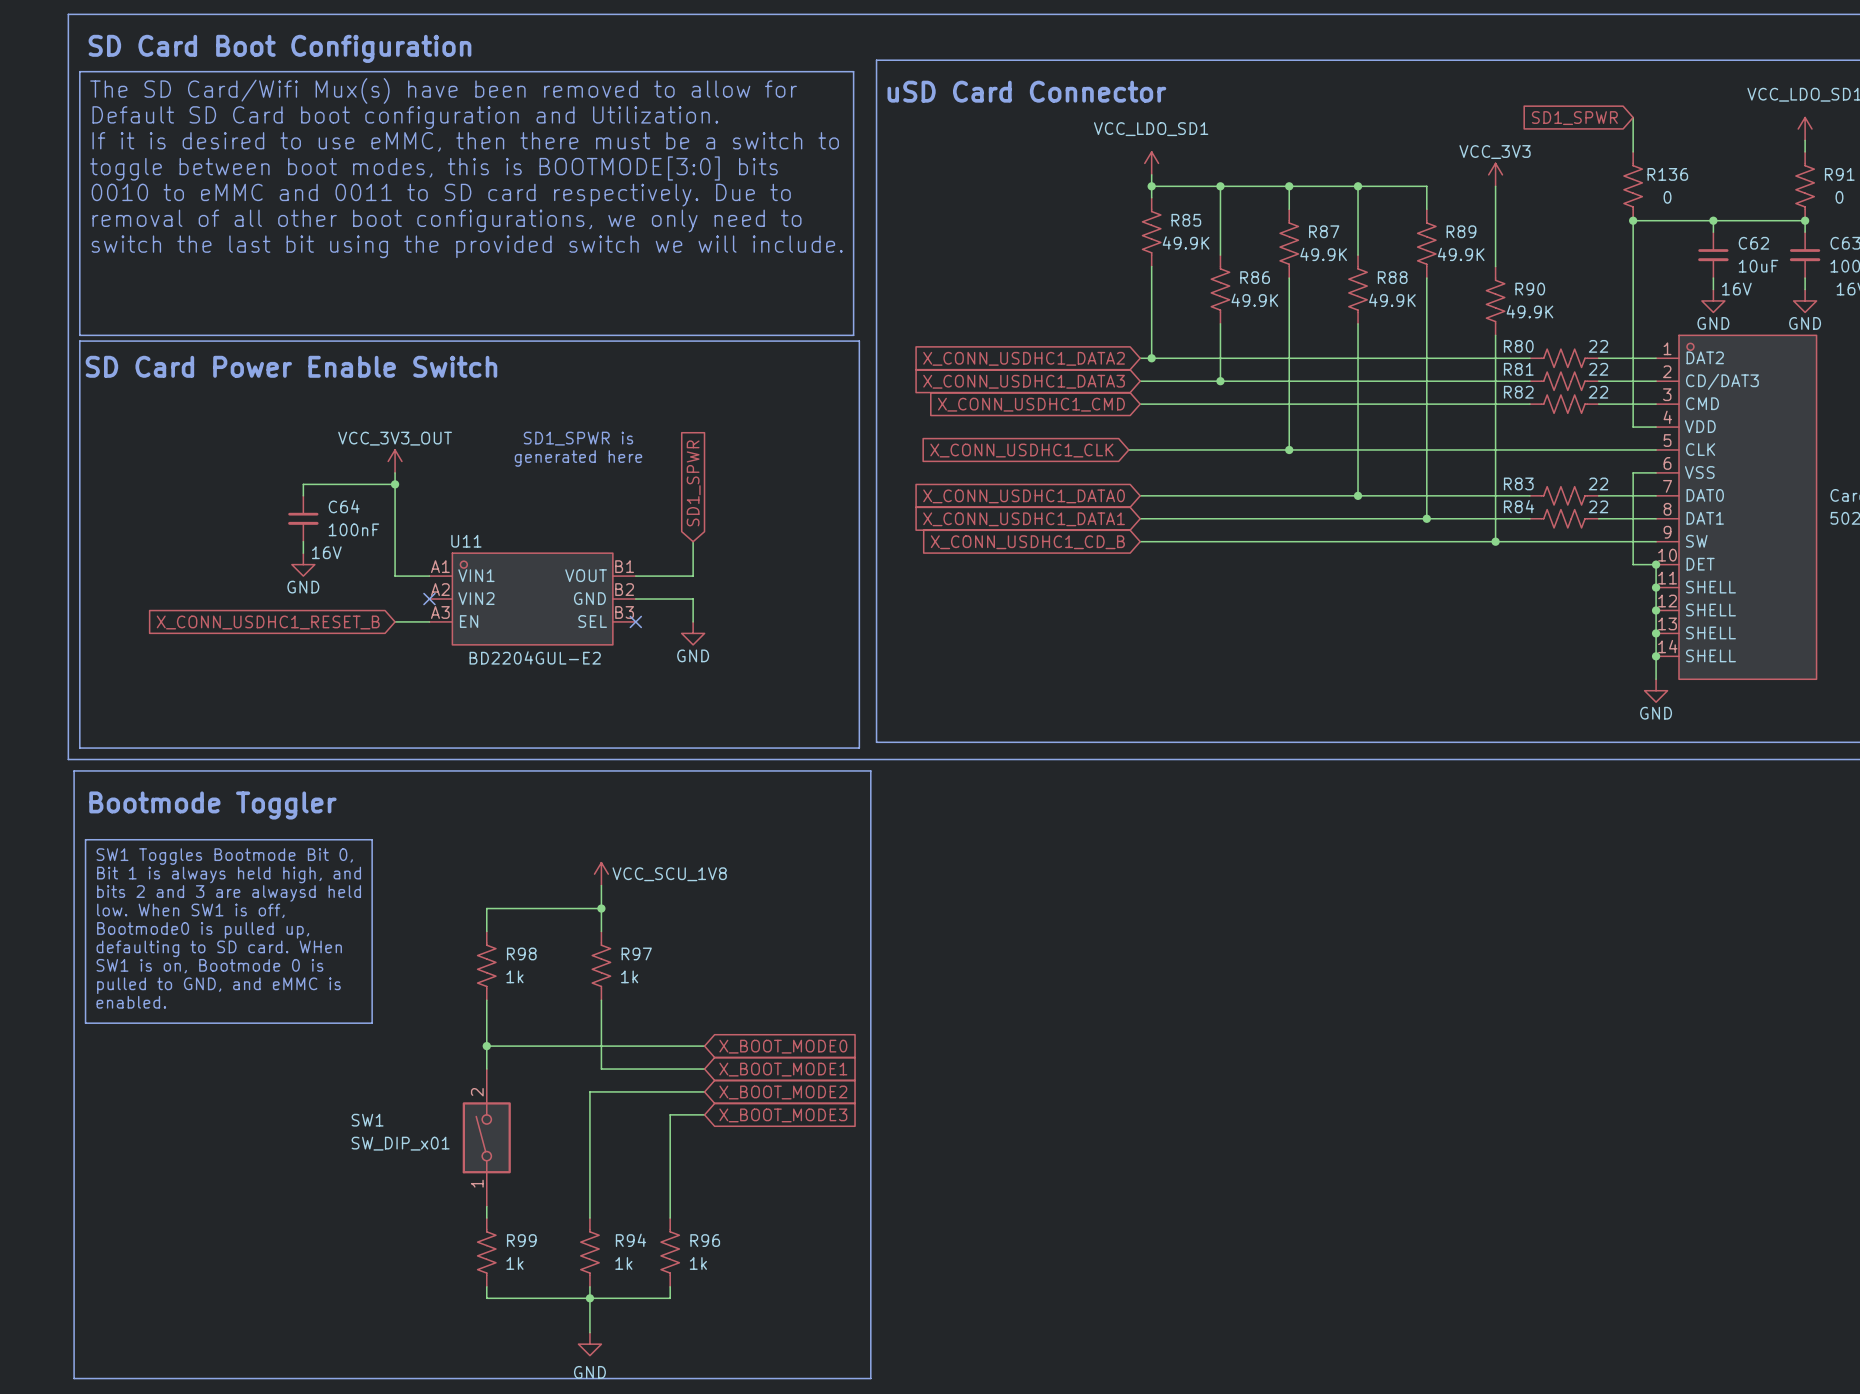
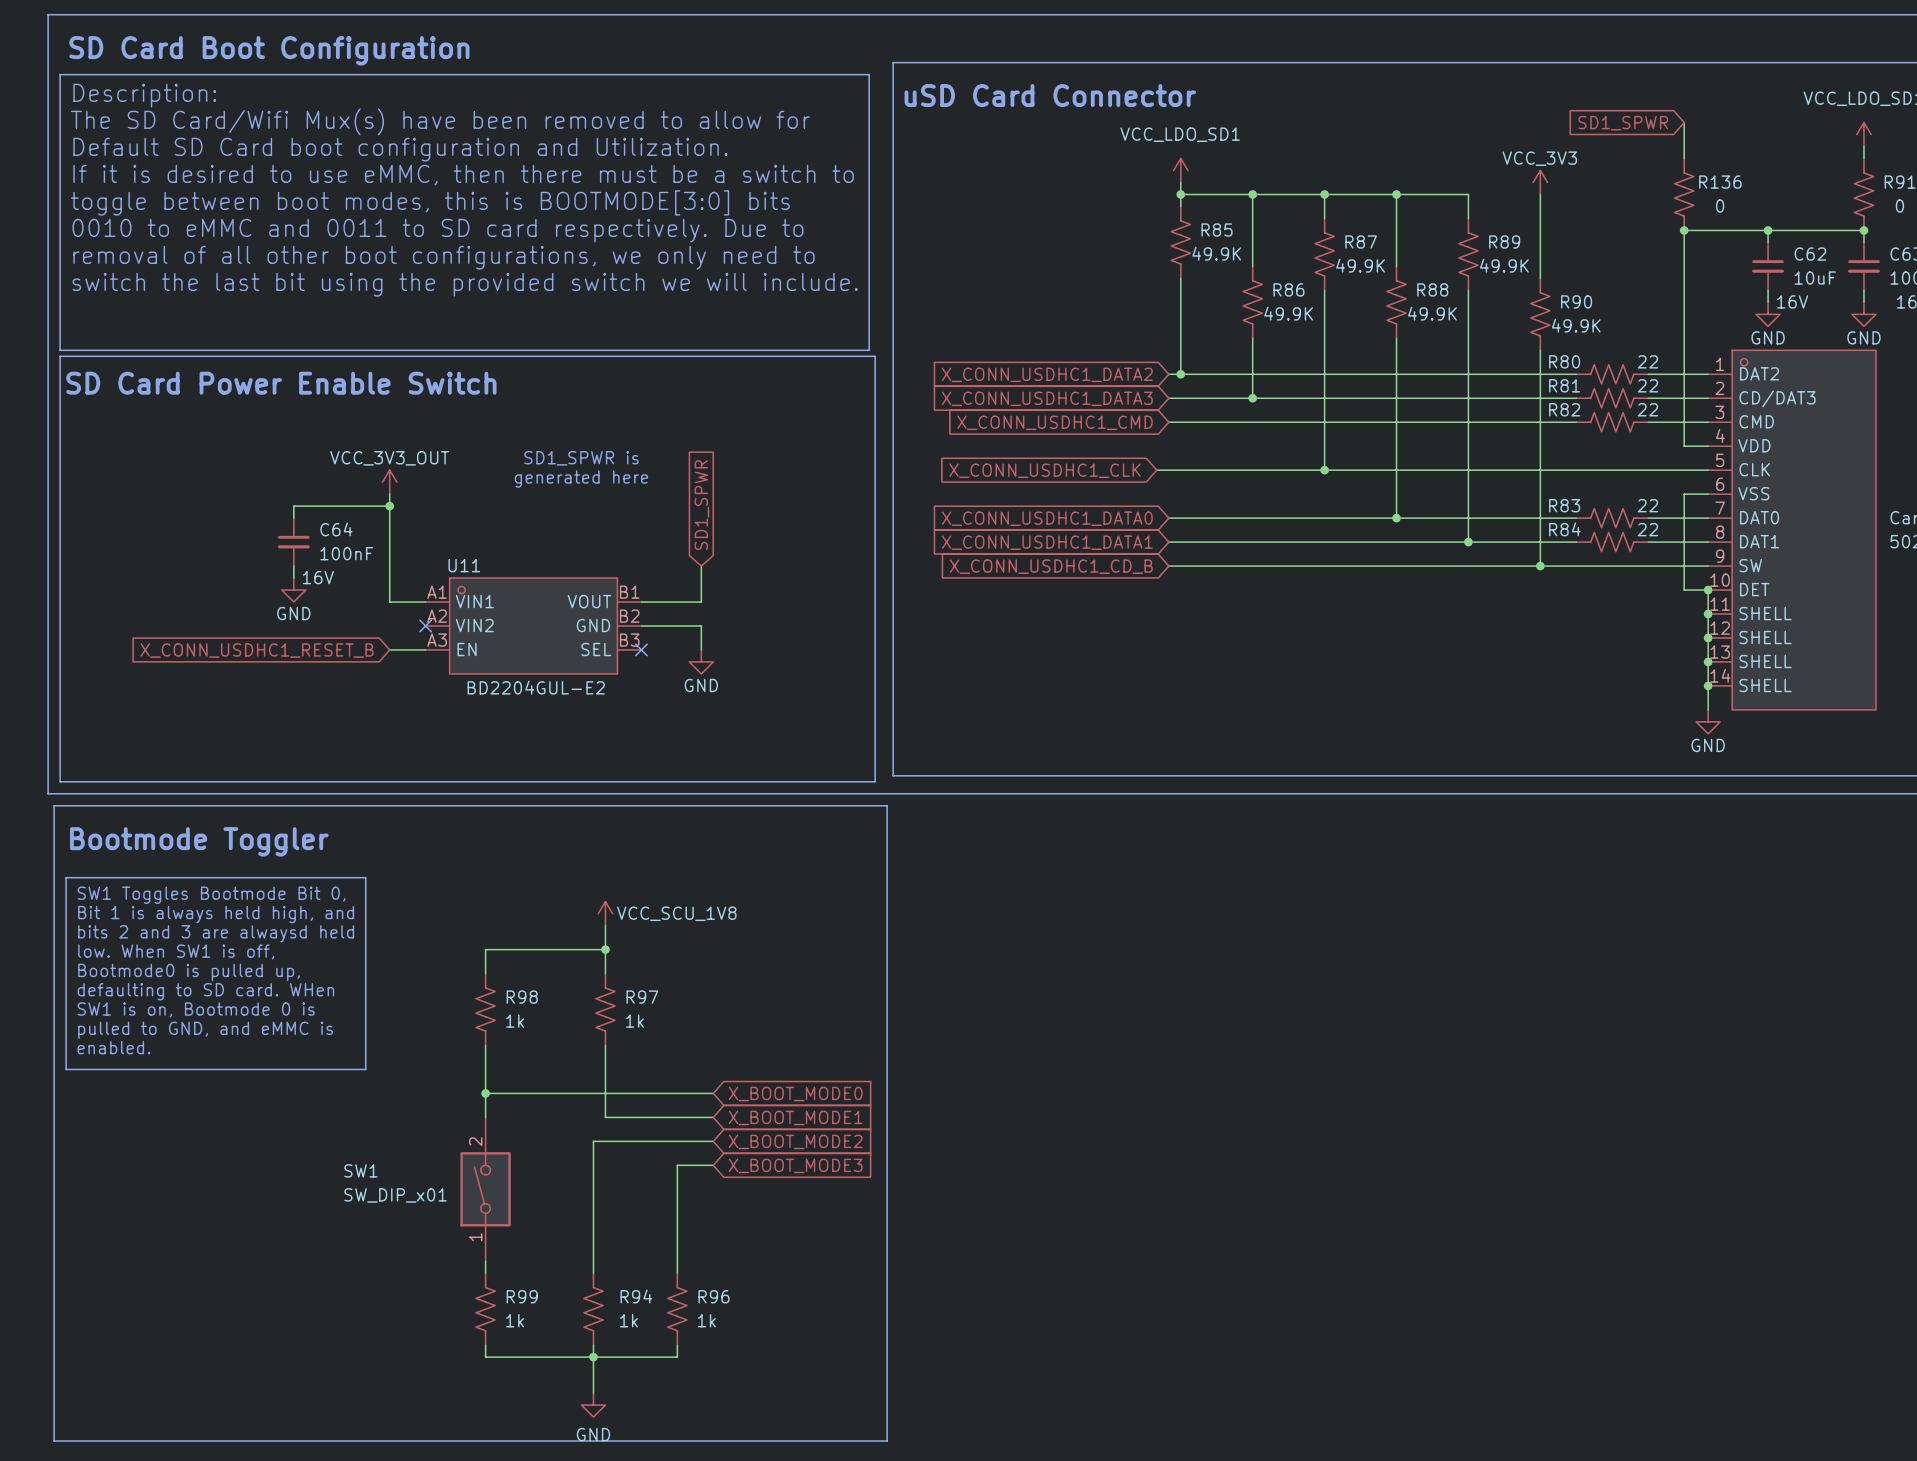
text: The SD Card/Wifi Mux(s) have been removed to allow for (443, 90) -> Description: (144, 95)
text: Default SD Card boot configuration and Utilization. (405, 117) -> The SD Card/Wifi Mux(s) have been removed to allow for (440, 121)
text: If it is desired to use eMMC, then there must be a switch to (465, 141) -> Default SD Card boot configuration and Utilization. (400, 149)
text: toggle between boot modes, this is BOOTMODE[3:0] bits (433, 168) -> If it is desired to use eMMC, then there must be a switch to (463, 175)
text: 0010 to eMMC and 0011 to SD card respectively. Due to (441, 195) -> toggle between boot modes, this is BOOTMODE[3:0] bits (430, 202)
text: removal of all other boot configurations, we only need to (446, 220) -> 0010 to eMMC and 0011 to SD card respectively. Due to (438, 230)
text: switch the last bit using the provided switch we will include. (467, 246) -> removal of all other boot configurations, we only need to (443, 257)
text: none -> switch the last bit using the provided switch we will include. (465, 284)

